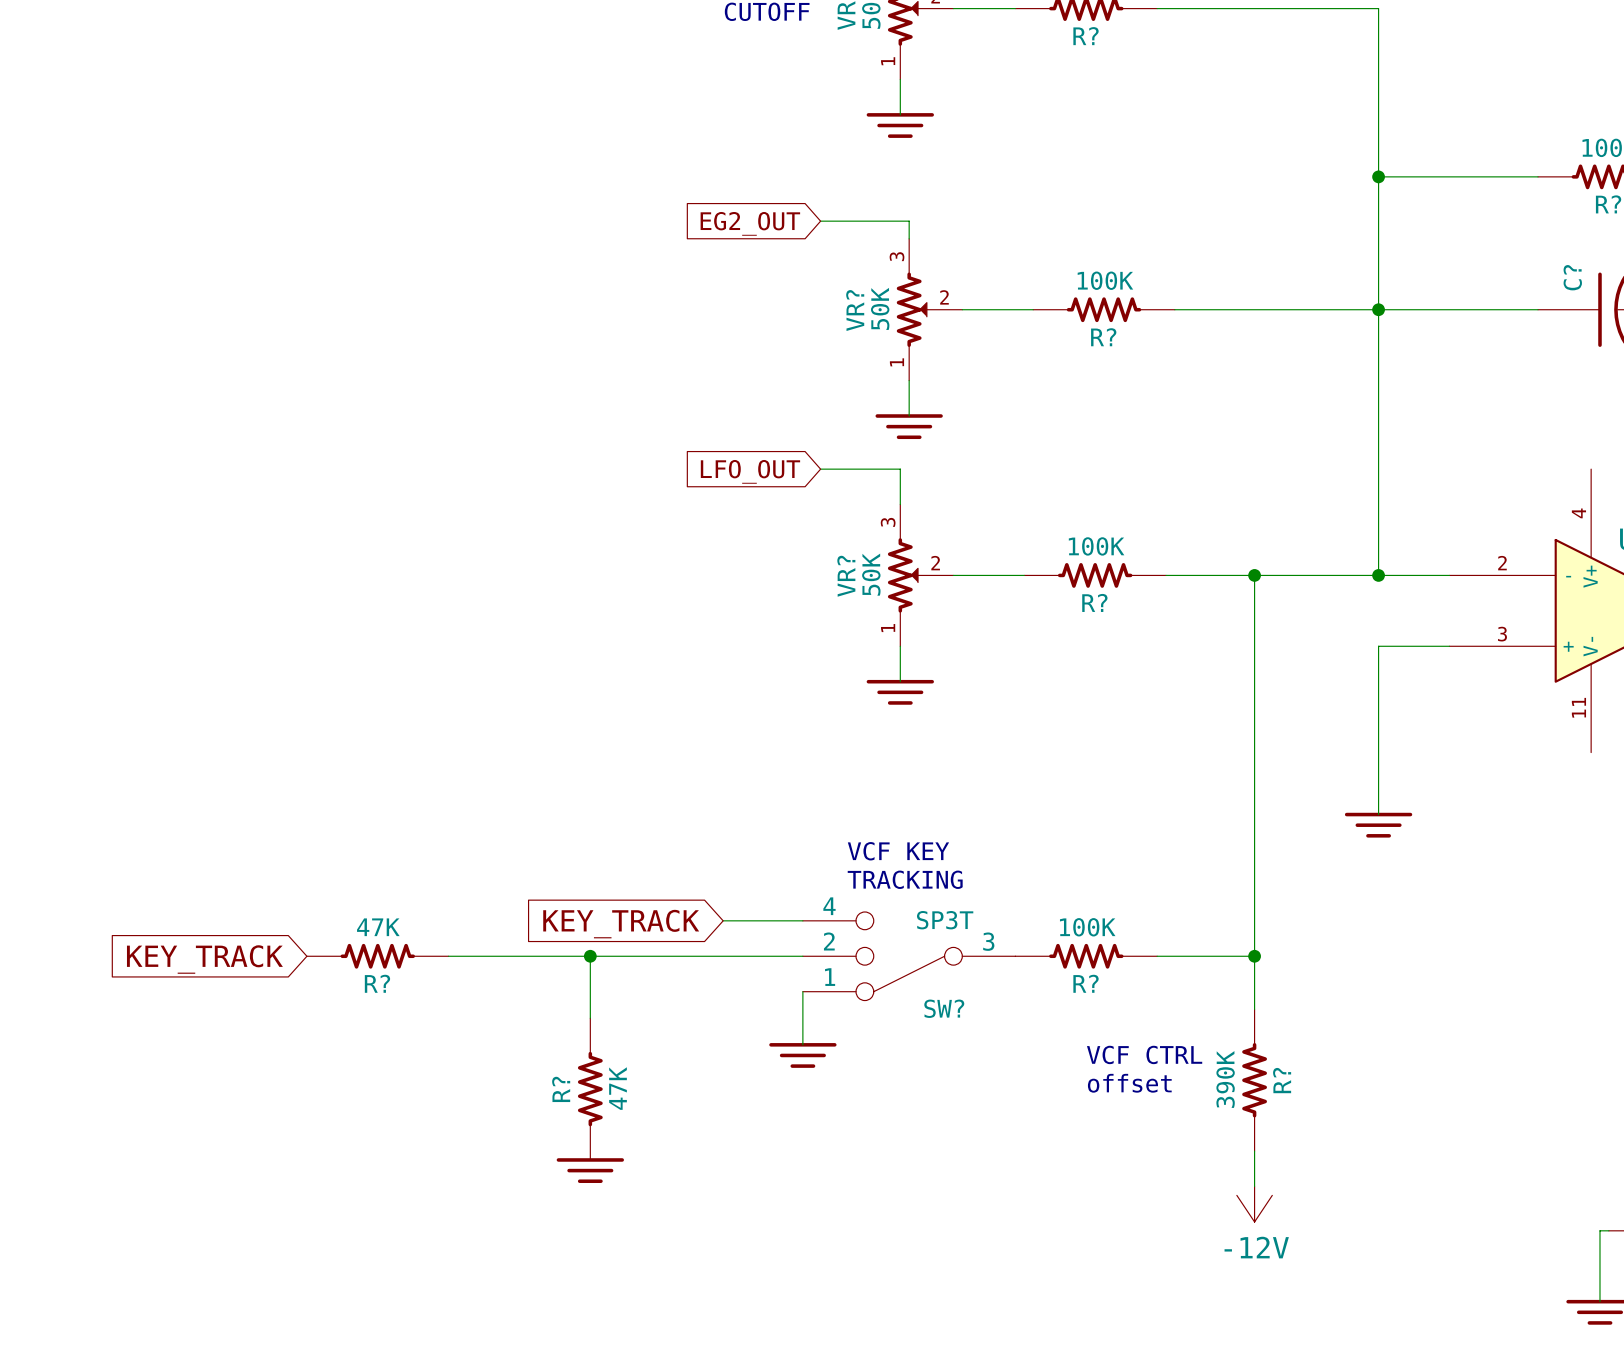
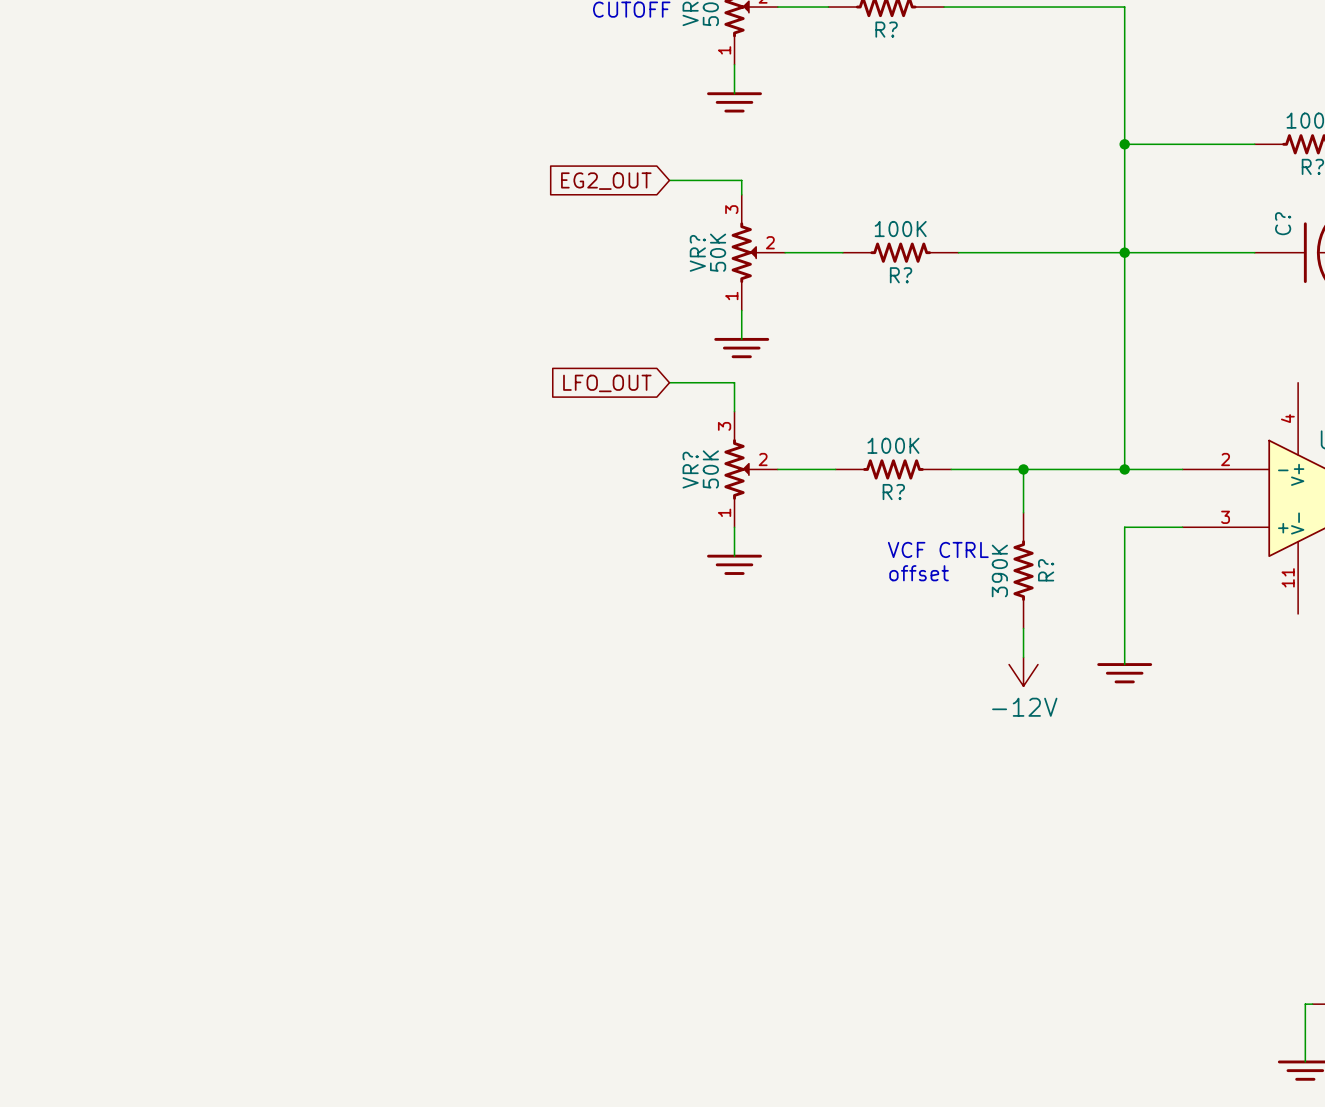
text: none -> VCF CTRL (938, 549)
R?: none -> 390K (1023, 570)
text: none -> offset (919, 573)
wire: (1254, 805) (1254, 1009) -> none
power symbol: none -> -12V (1023, 671)
text: VCF KEY (898, 851) -> none
text: TRACKING (905, 879) -> none
wire: (723, 920) (802, 920) -> none
global label: KEY_TRACK (621, 924) -> none
R?: 47K (377, 956) -> none
wire: (448, 956) (802, 956) -> none
wire: (590, 956) (590, 1018) -> none
junction: (590, 956) -> none
SW?: SP3T (909, 956) -> none
R?: 100K (1086, 956) -> none
wire: (1157, 956) (1254, 956) -> none
junction: (1254, 956) -> none
global label: KEY_TRACK (204, 959) -> none
wire: (802, 991) (802, 1044) -> none
text: VCF CTRL (1144, 1054) -> none
power symbol: (802, 1055) -> none
R?: 390K (1254, 1080) -> none
text: offset (1129, 1083) -> none
R?: 47K (590, 1089) -> none
wire: (1254, 1151) (1254, 1186) -> none
power symbol: (590, 1170) -> none
power symbol: -12V (1254, 1204) -> none

